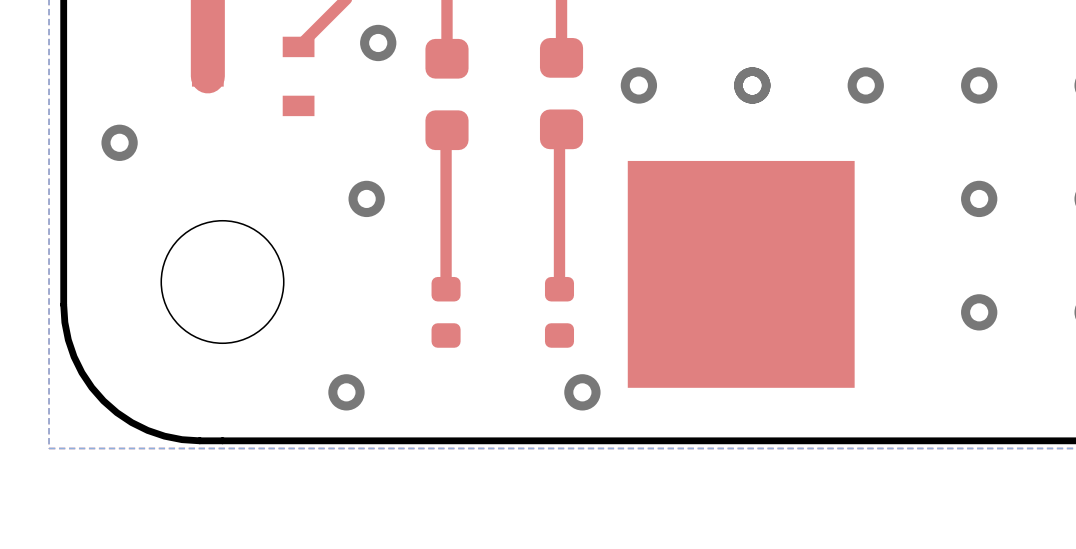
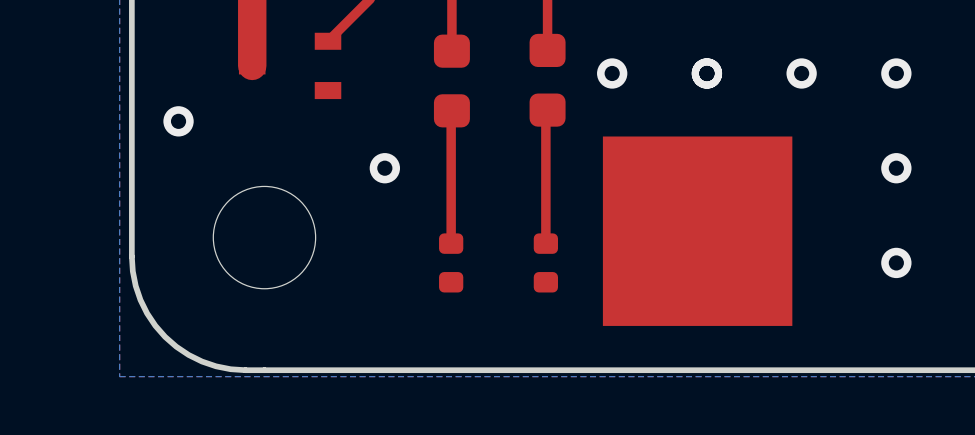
via: (378, 42) -> none
via: (346, 392) -> none
via: (582, 392) -> none

